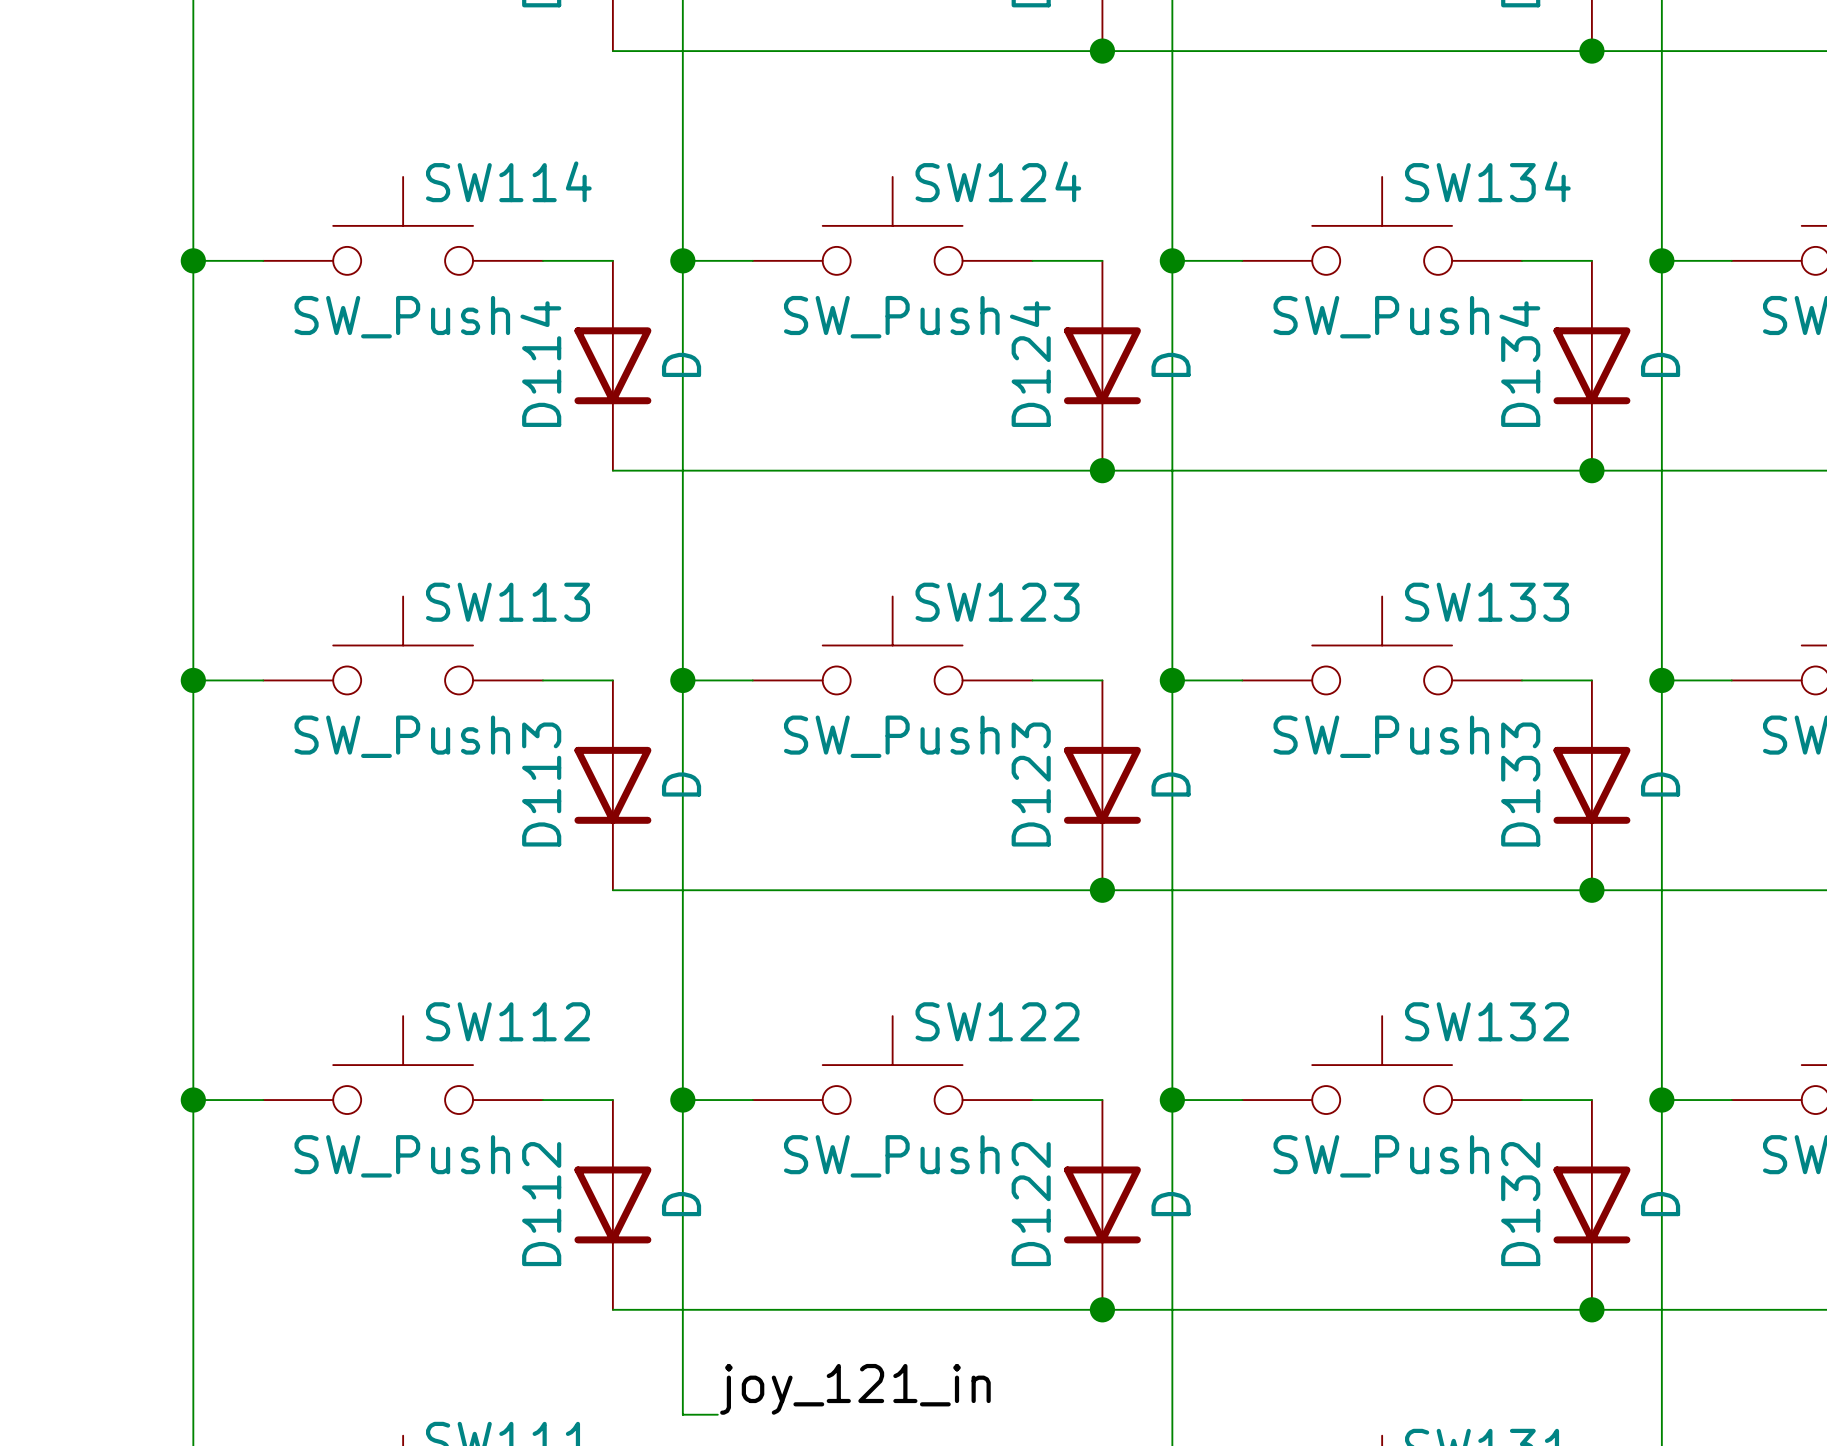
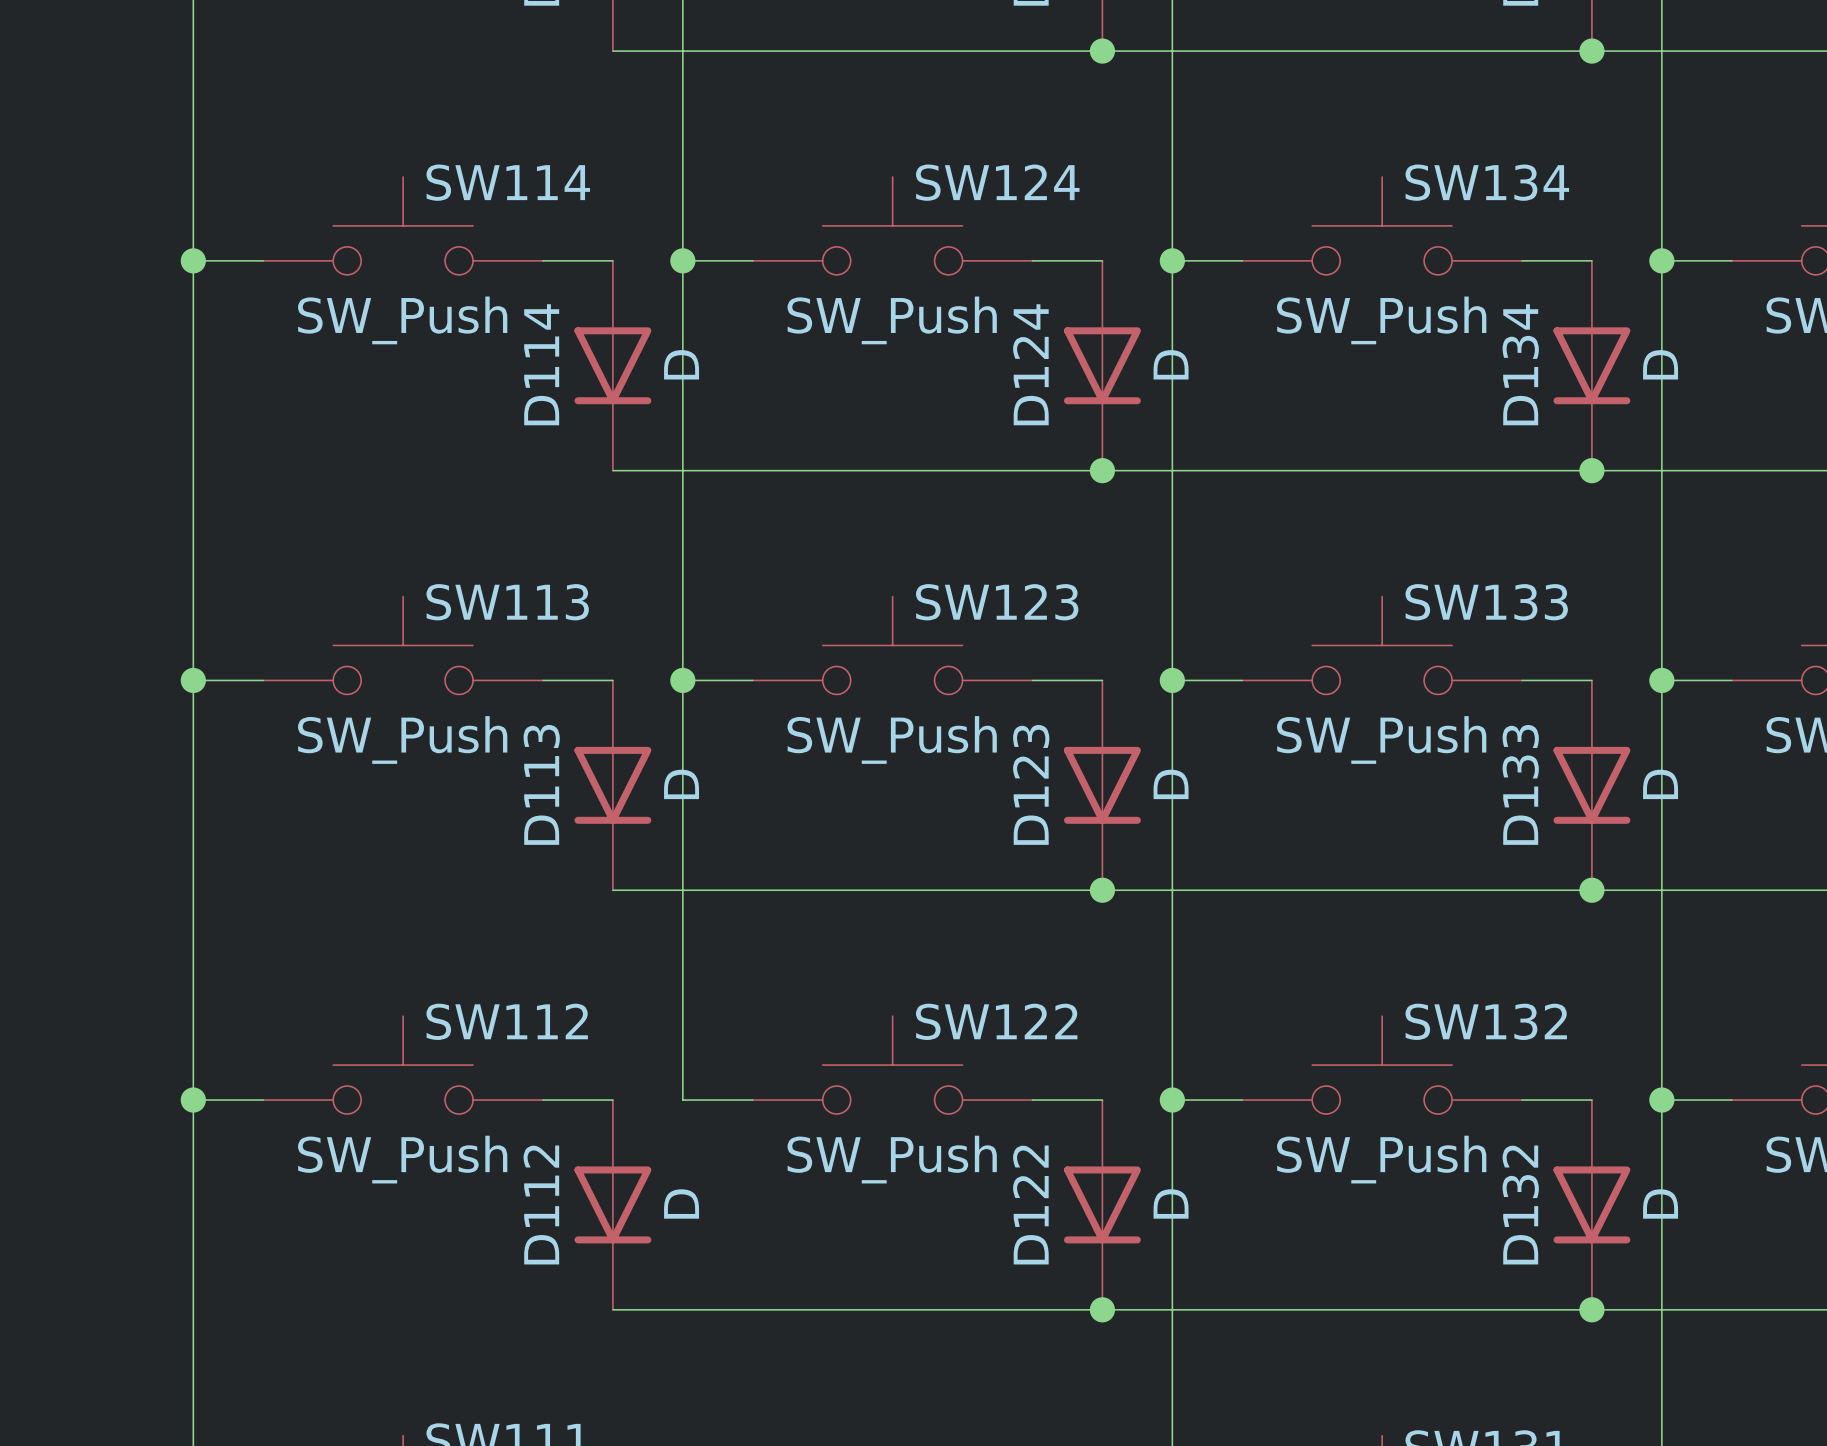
wire: (682, 1100) (682, 1414) (717, 1414) -> none
junction: (682, 1100) -> none
label: joy_121_in (855, 1389) -> none

